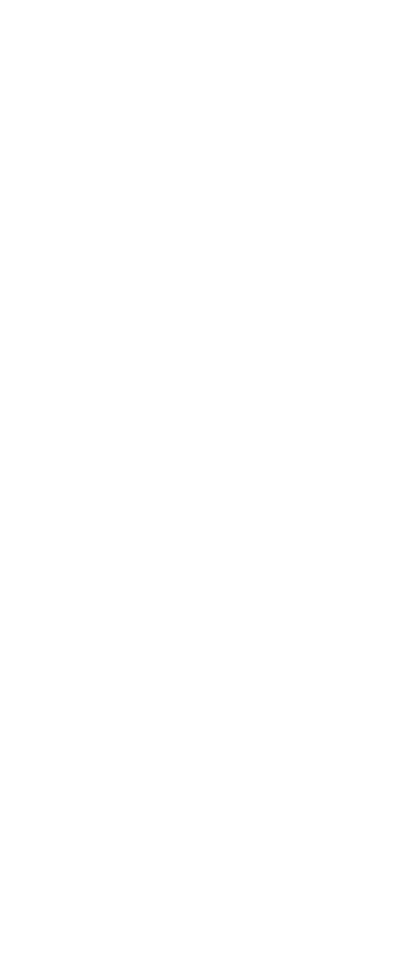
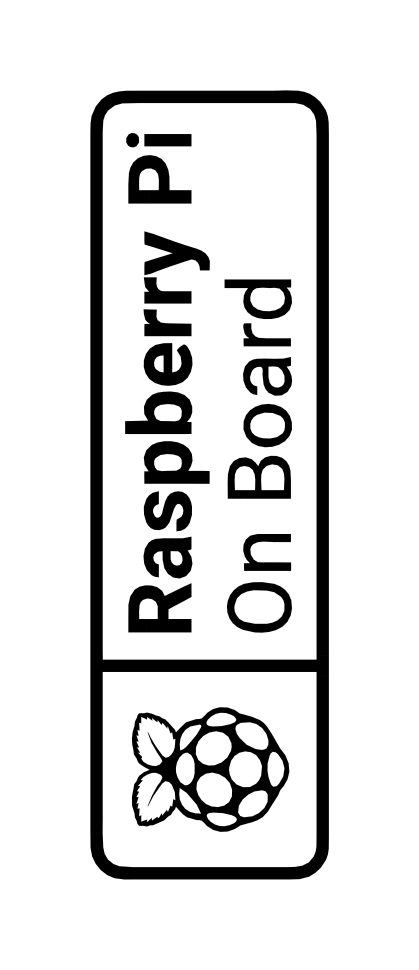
drawing: none -> [90, 90, 329, 880]

